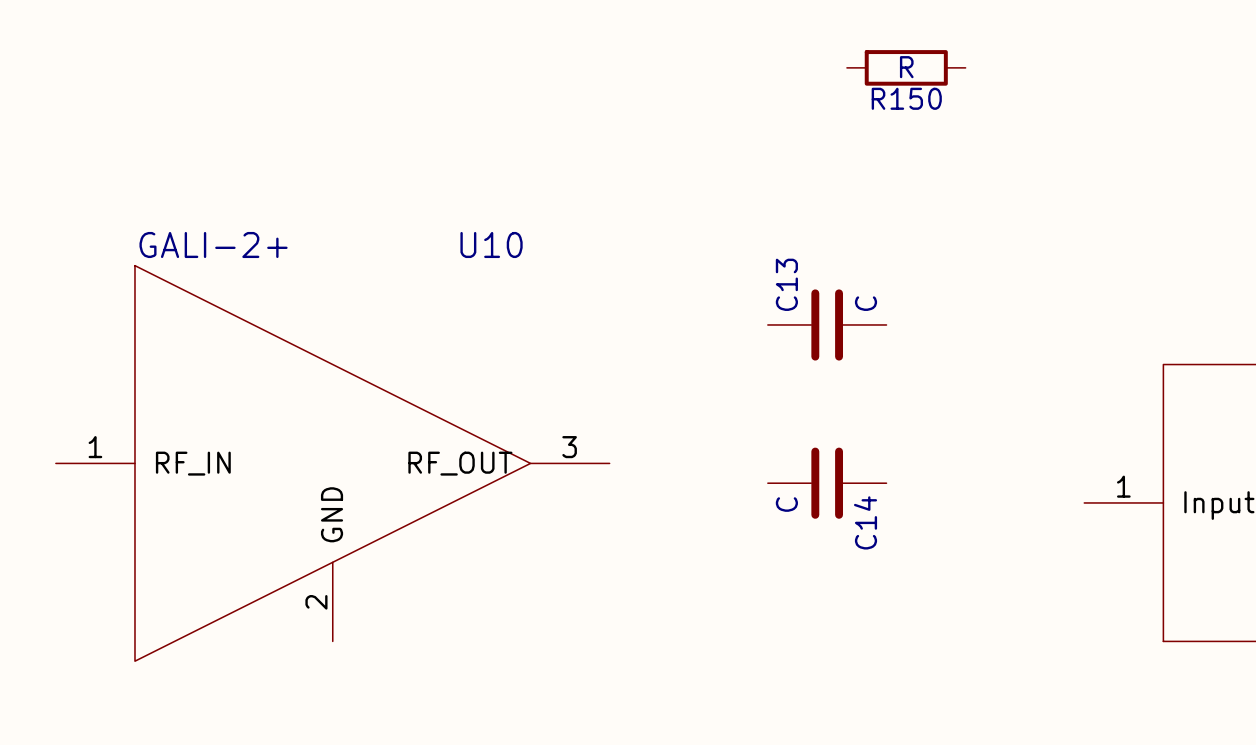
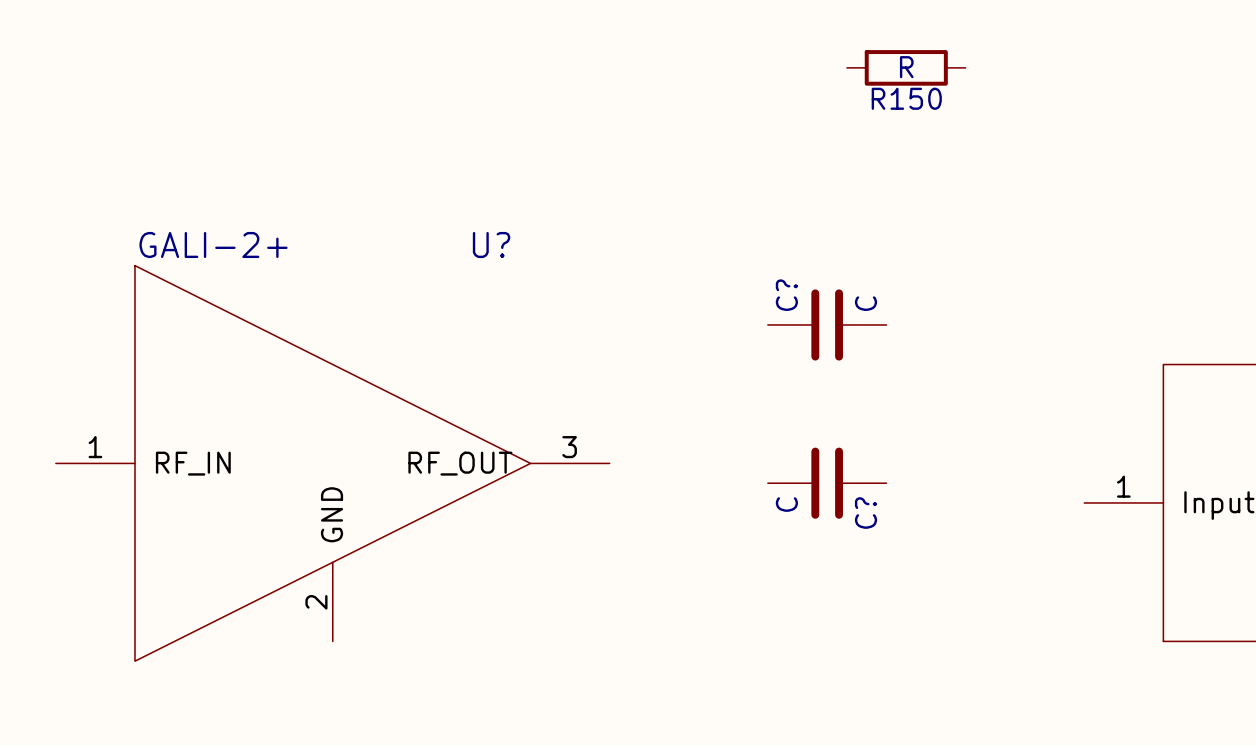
U10 name: U10 (491, 244) -> U? (491, 244)
C13 name: C13 (786, 284) -> C? (786, 295)
C14 name: C14 (865, 522) -> C? (865, 513)

